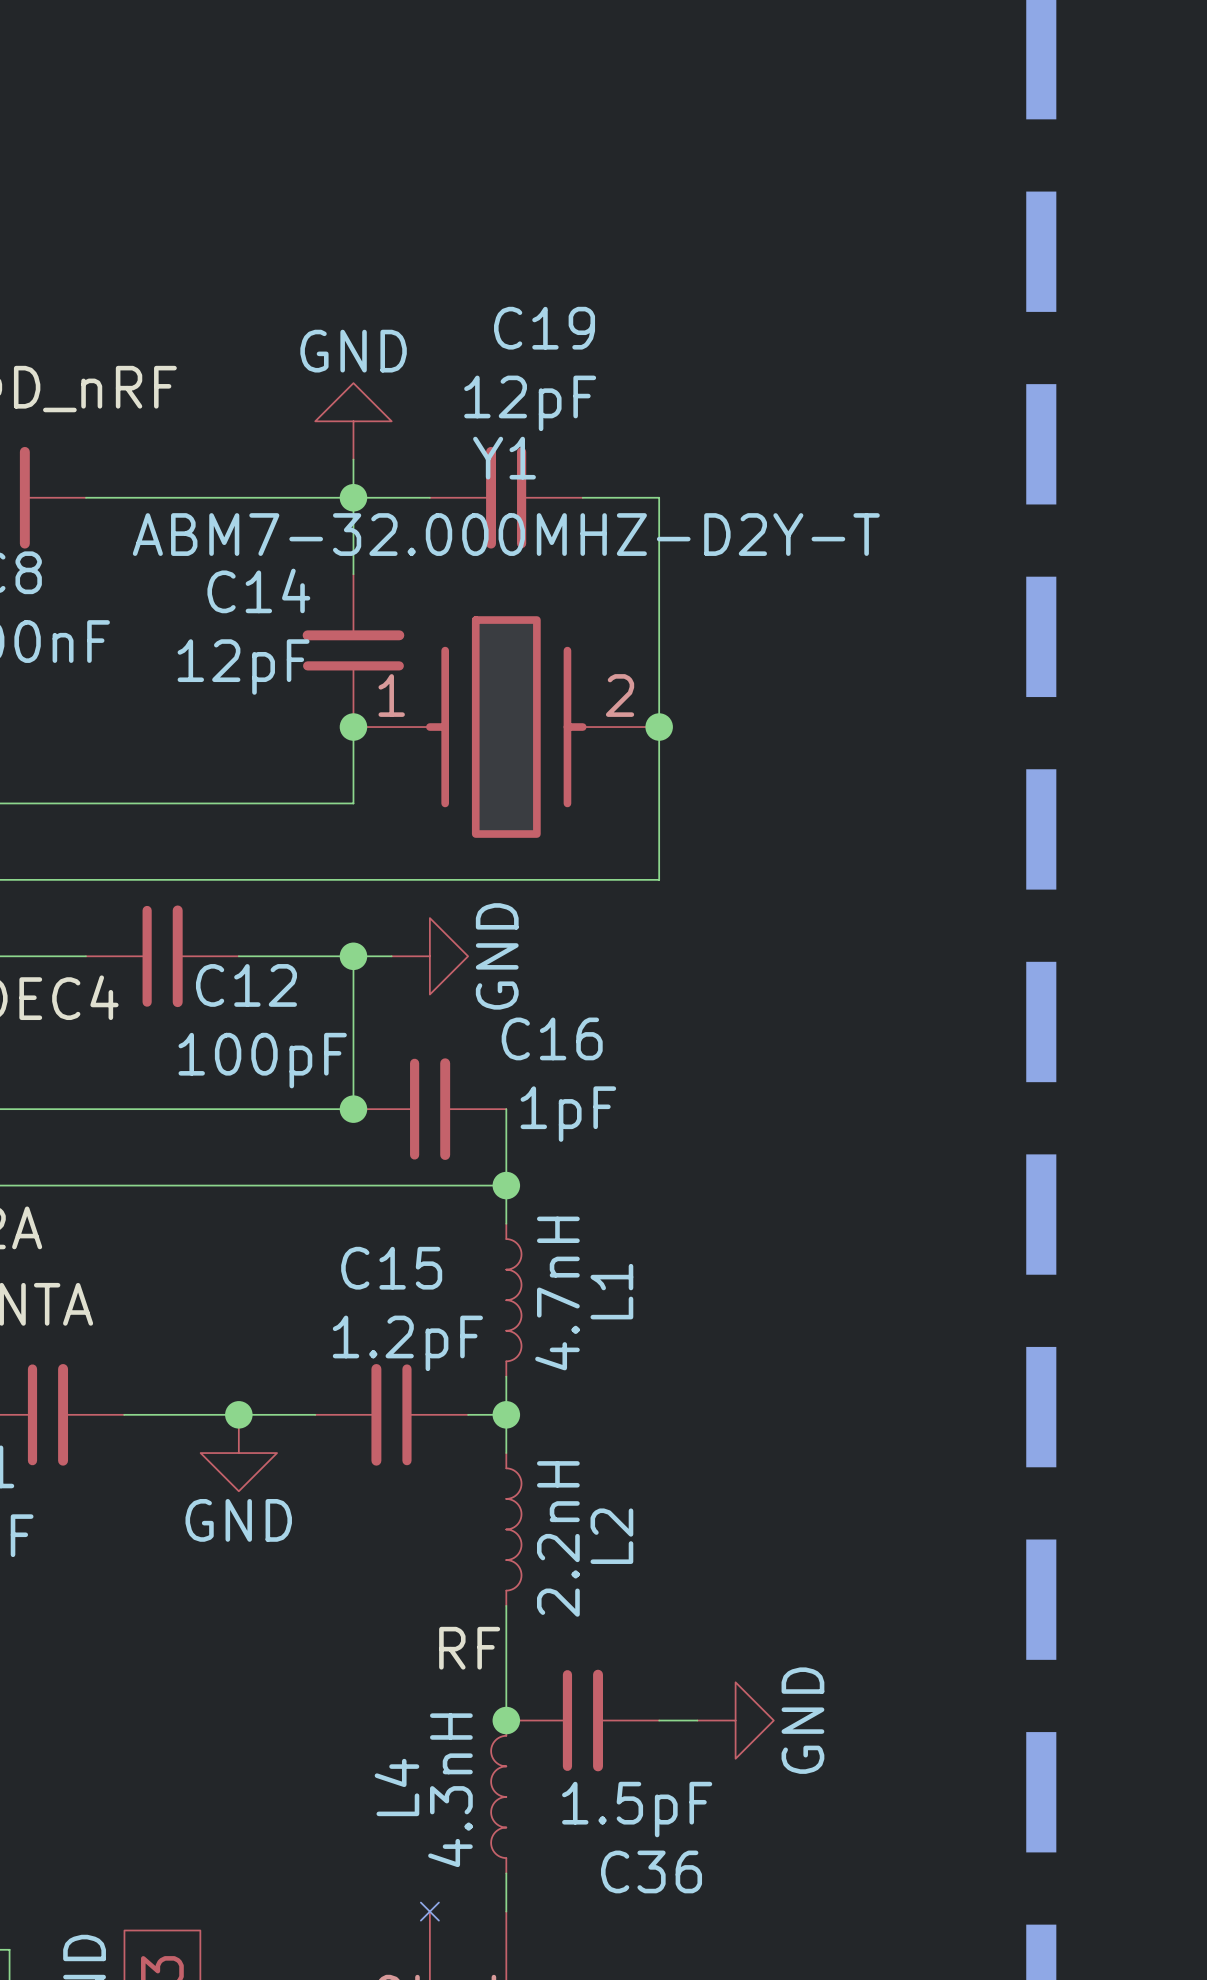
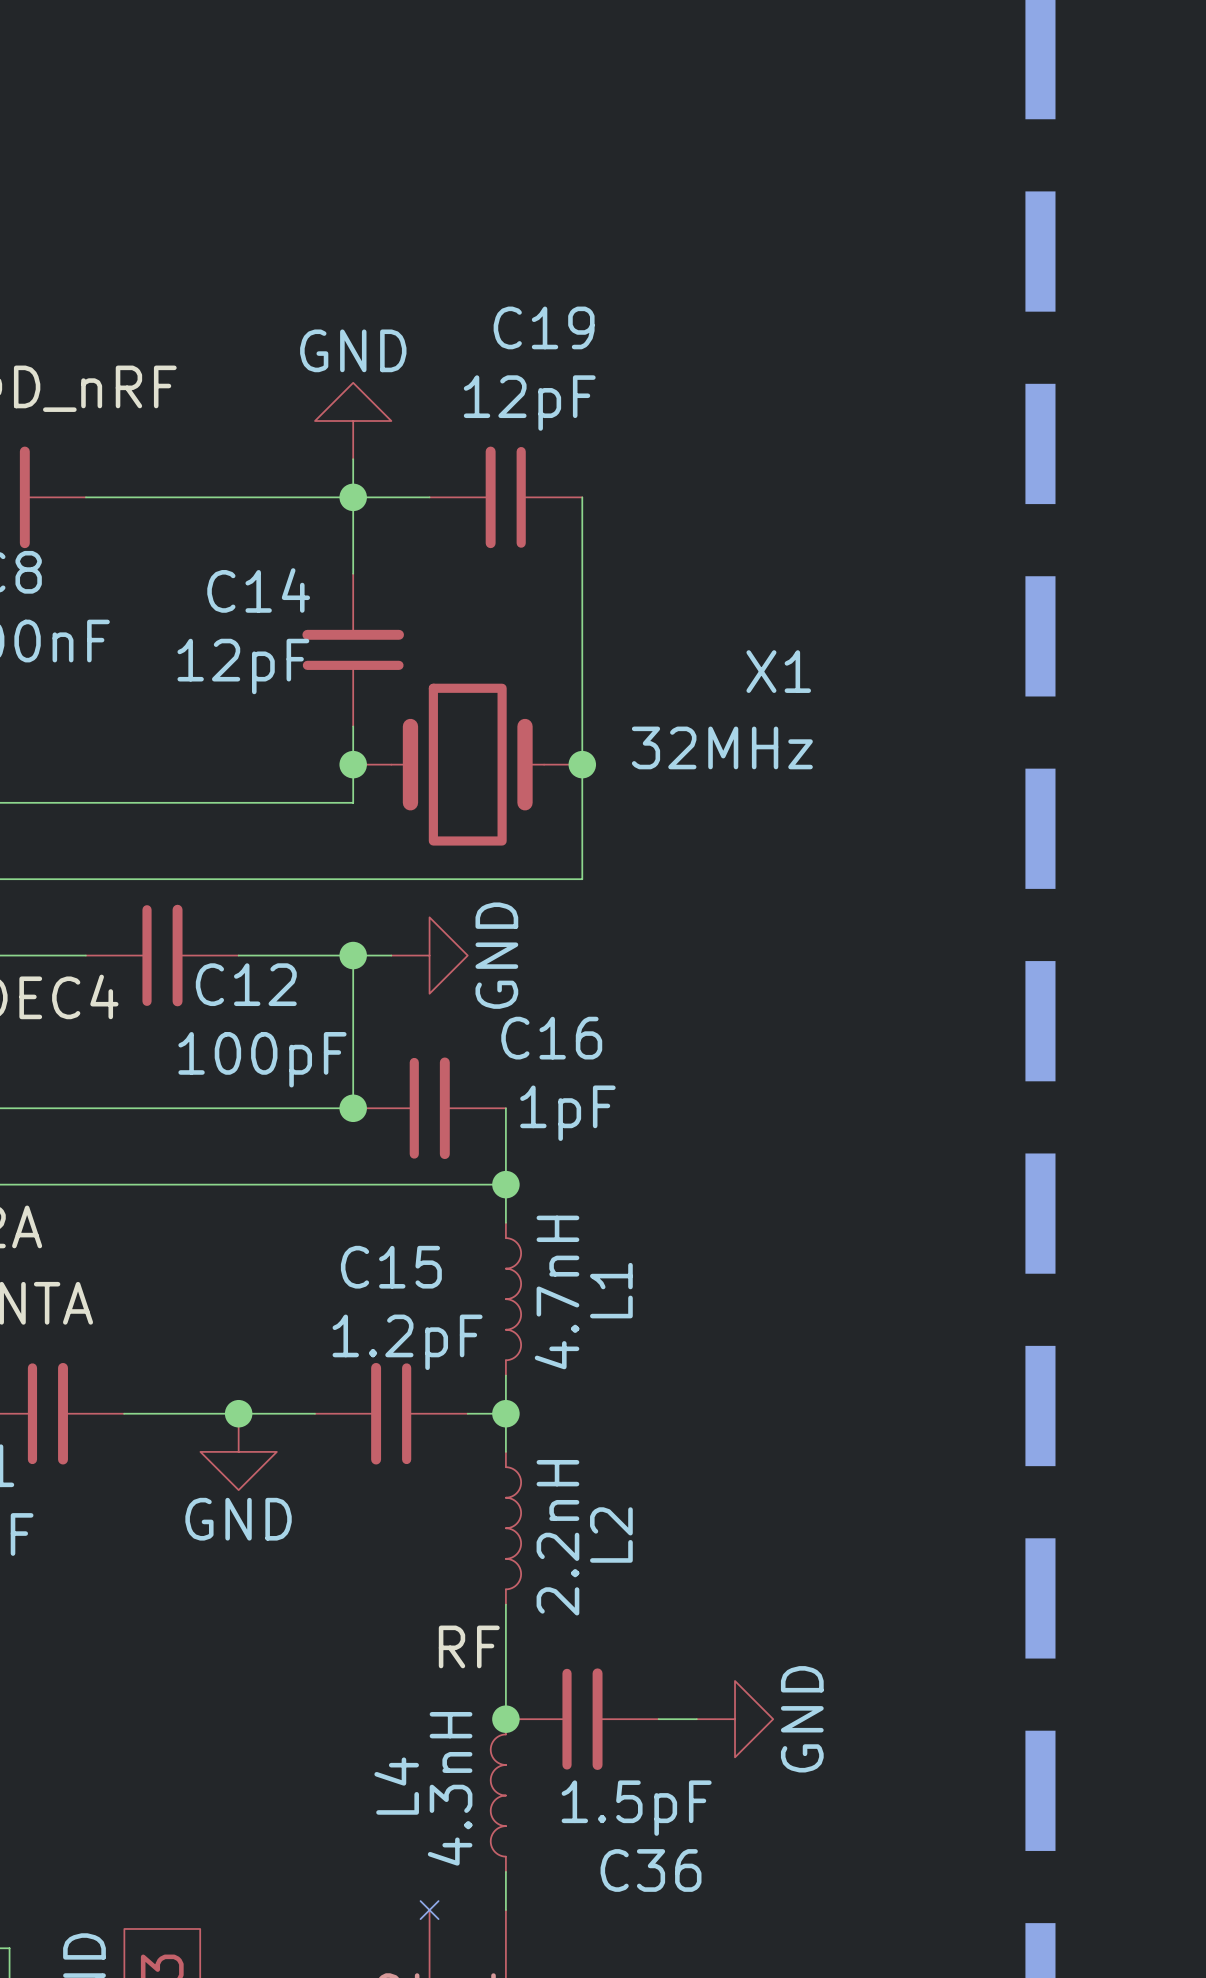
wire: (582, 497) (659, 497) (659, 879) (582, 879) -> (582, 497) (582, 879)
junction position: (353, 727) -> (353, 764)
Y1: ABM7-32.000MHZ-D2Y-T (506, 727) -> none
junction position: (659, 727) -> (582, 764)
X1: none -> 32MHz (467, 764)

